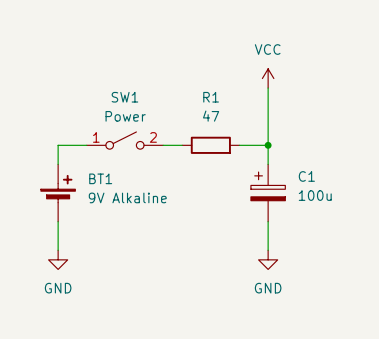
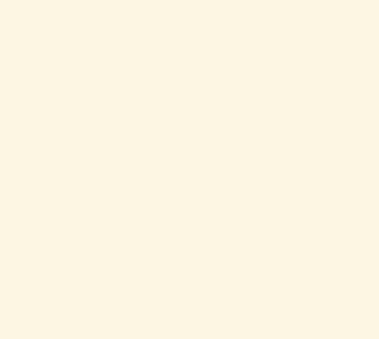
power symbol: VCC (268, 78) -> none
wire: (268, 88) (268, 164) -> none
SW1: Power (124, 140) -> none
wire: (86, 145) (58, 145) (58, 164) -> none
wire: (163, 145) (182, 145) -> none
R1: 47 (210, 145) -> none
wire: (239, 145) (268, 145) -> none
junction: (268, 145) -> none
BT1: 9V Alkaline (58, 193) -> none
C1: 100u (268, 193) -> none
wire: (58, 221) (58, 250) -> none
wire: (268, 221) (268, 250) -> none
power symbol: GND (58, 259) -> none
power symbol: GND (268, 259) -> none

